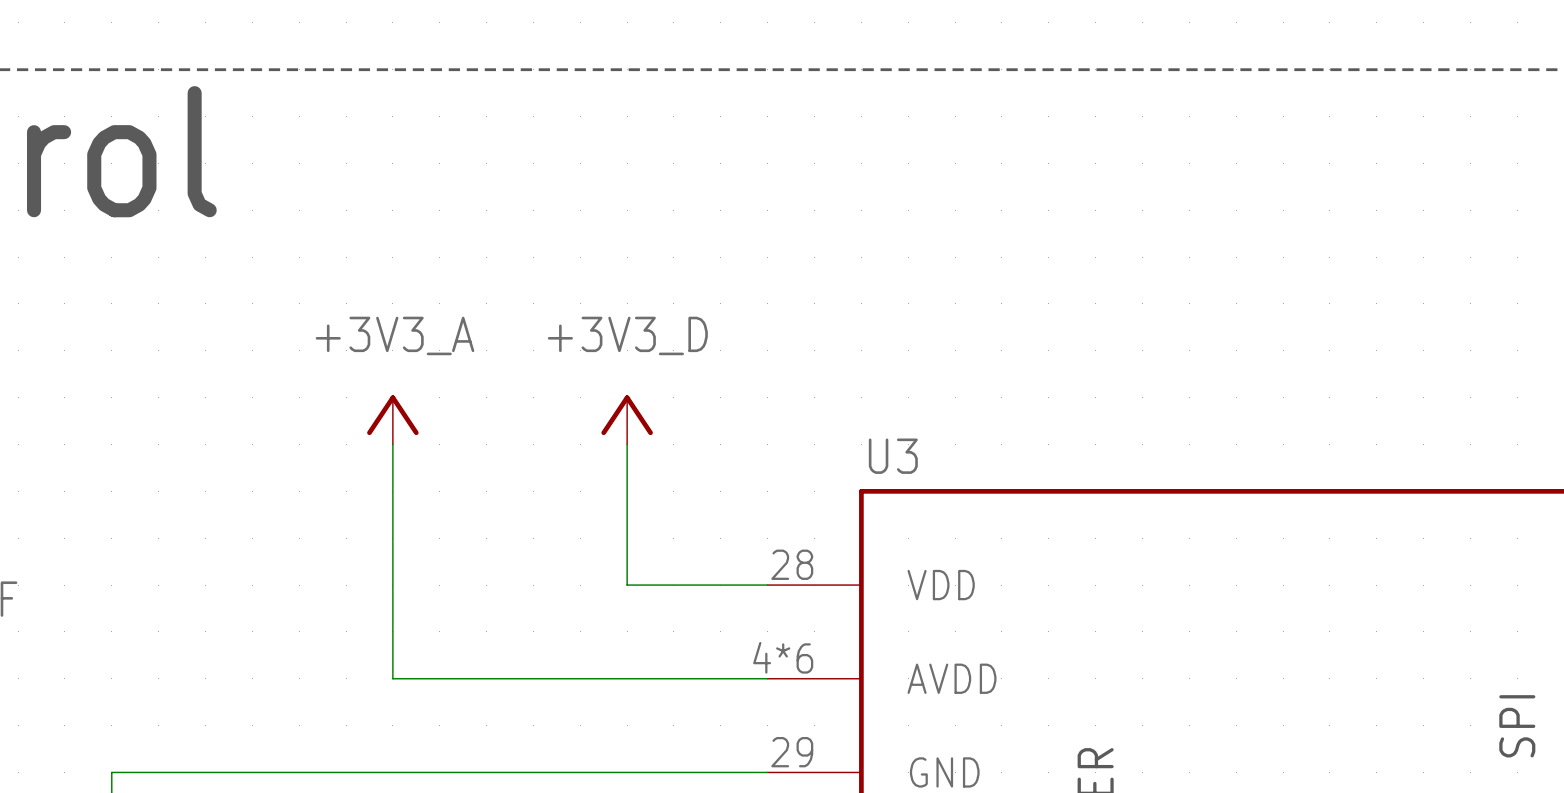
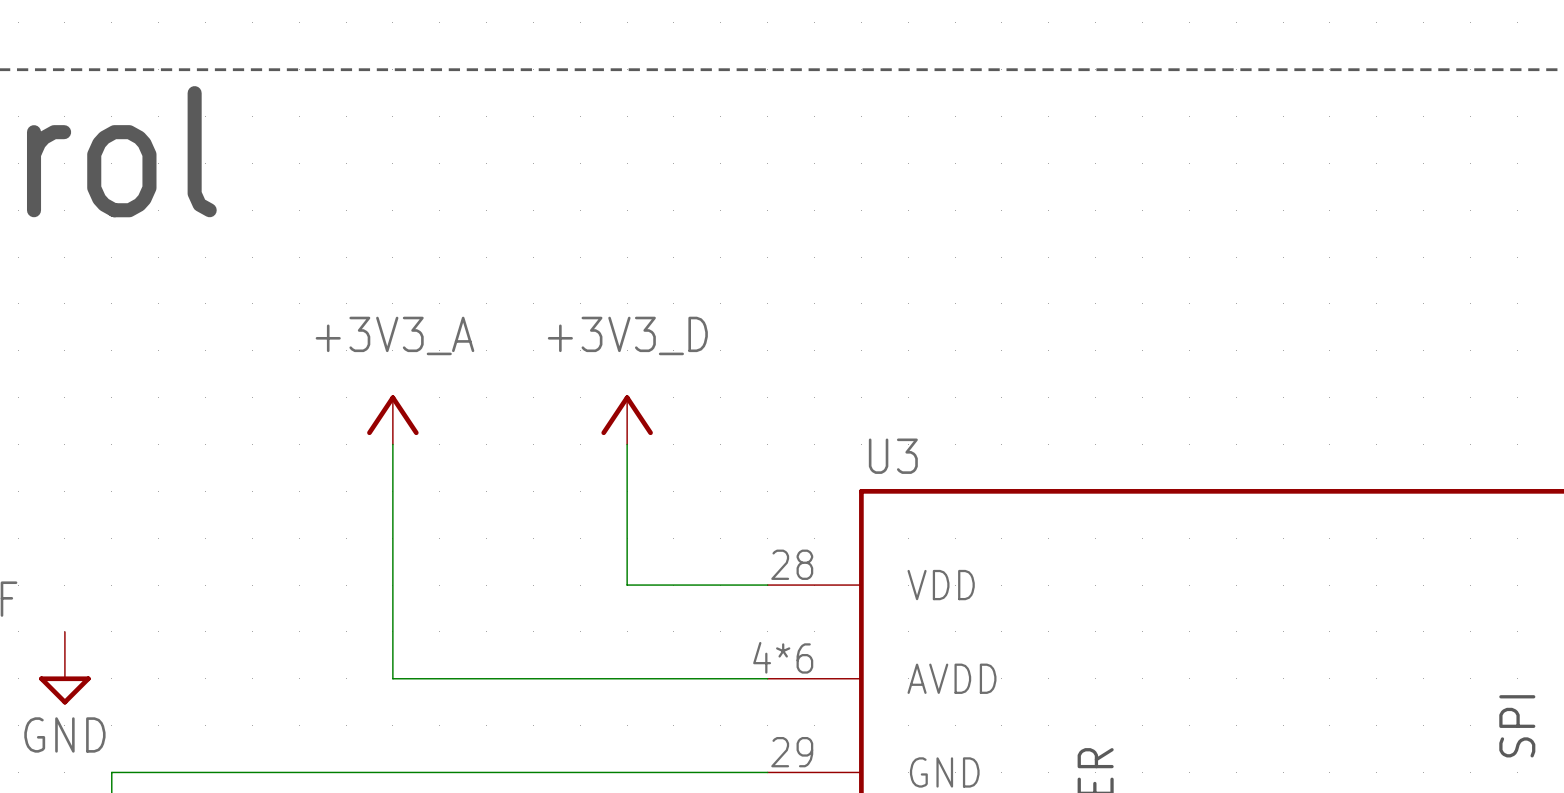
power symbol: none -> GND (64, 668)

